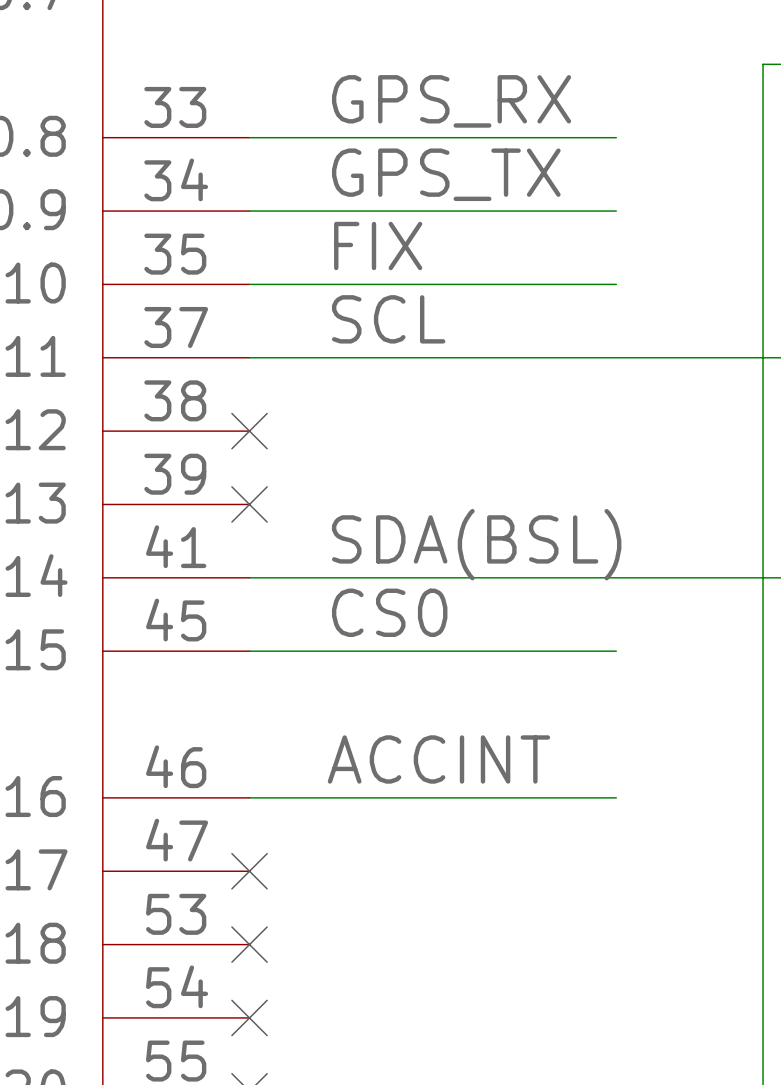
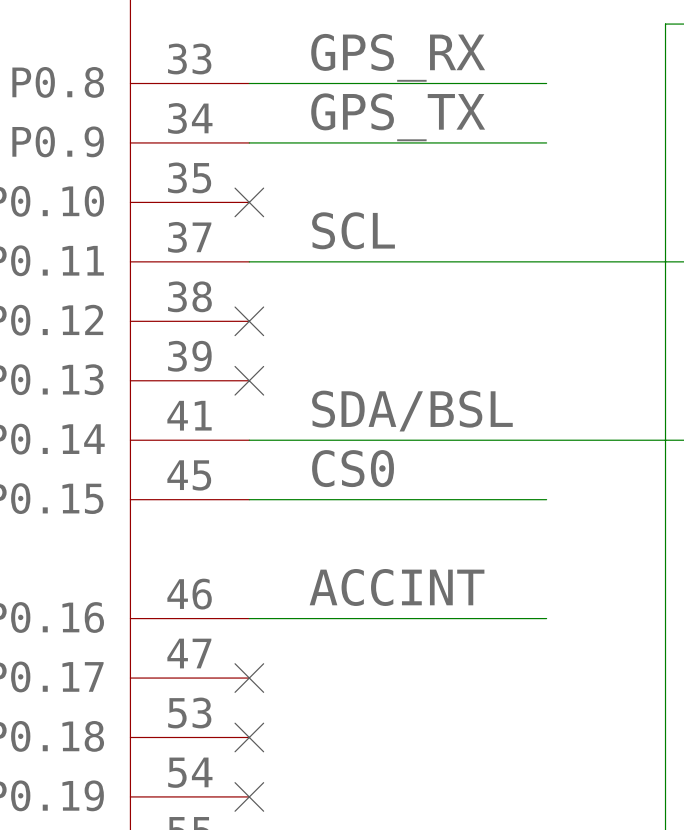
label: FIX (378, 246) -> none
wire: (249, 284) (616, 284) -> none
no-connect mark: none -> (249, 202)
label: SDA(BSL) (476, 544) -> SDA/BSL (412, 411)

